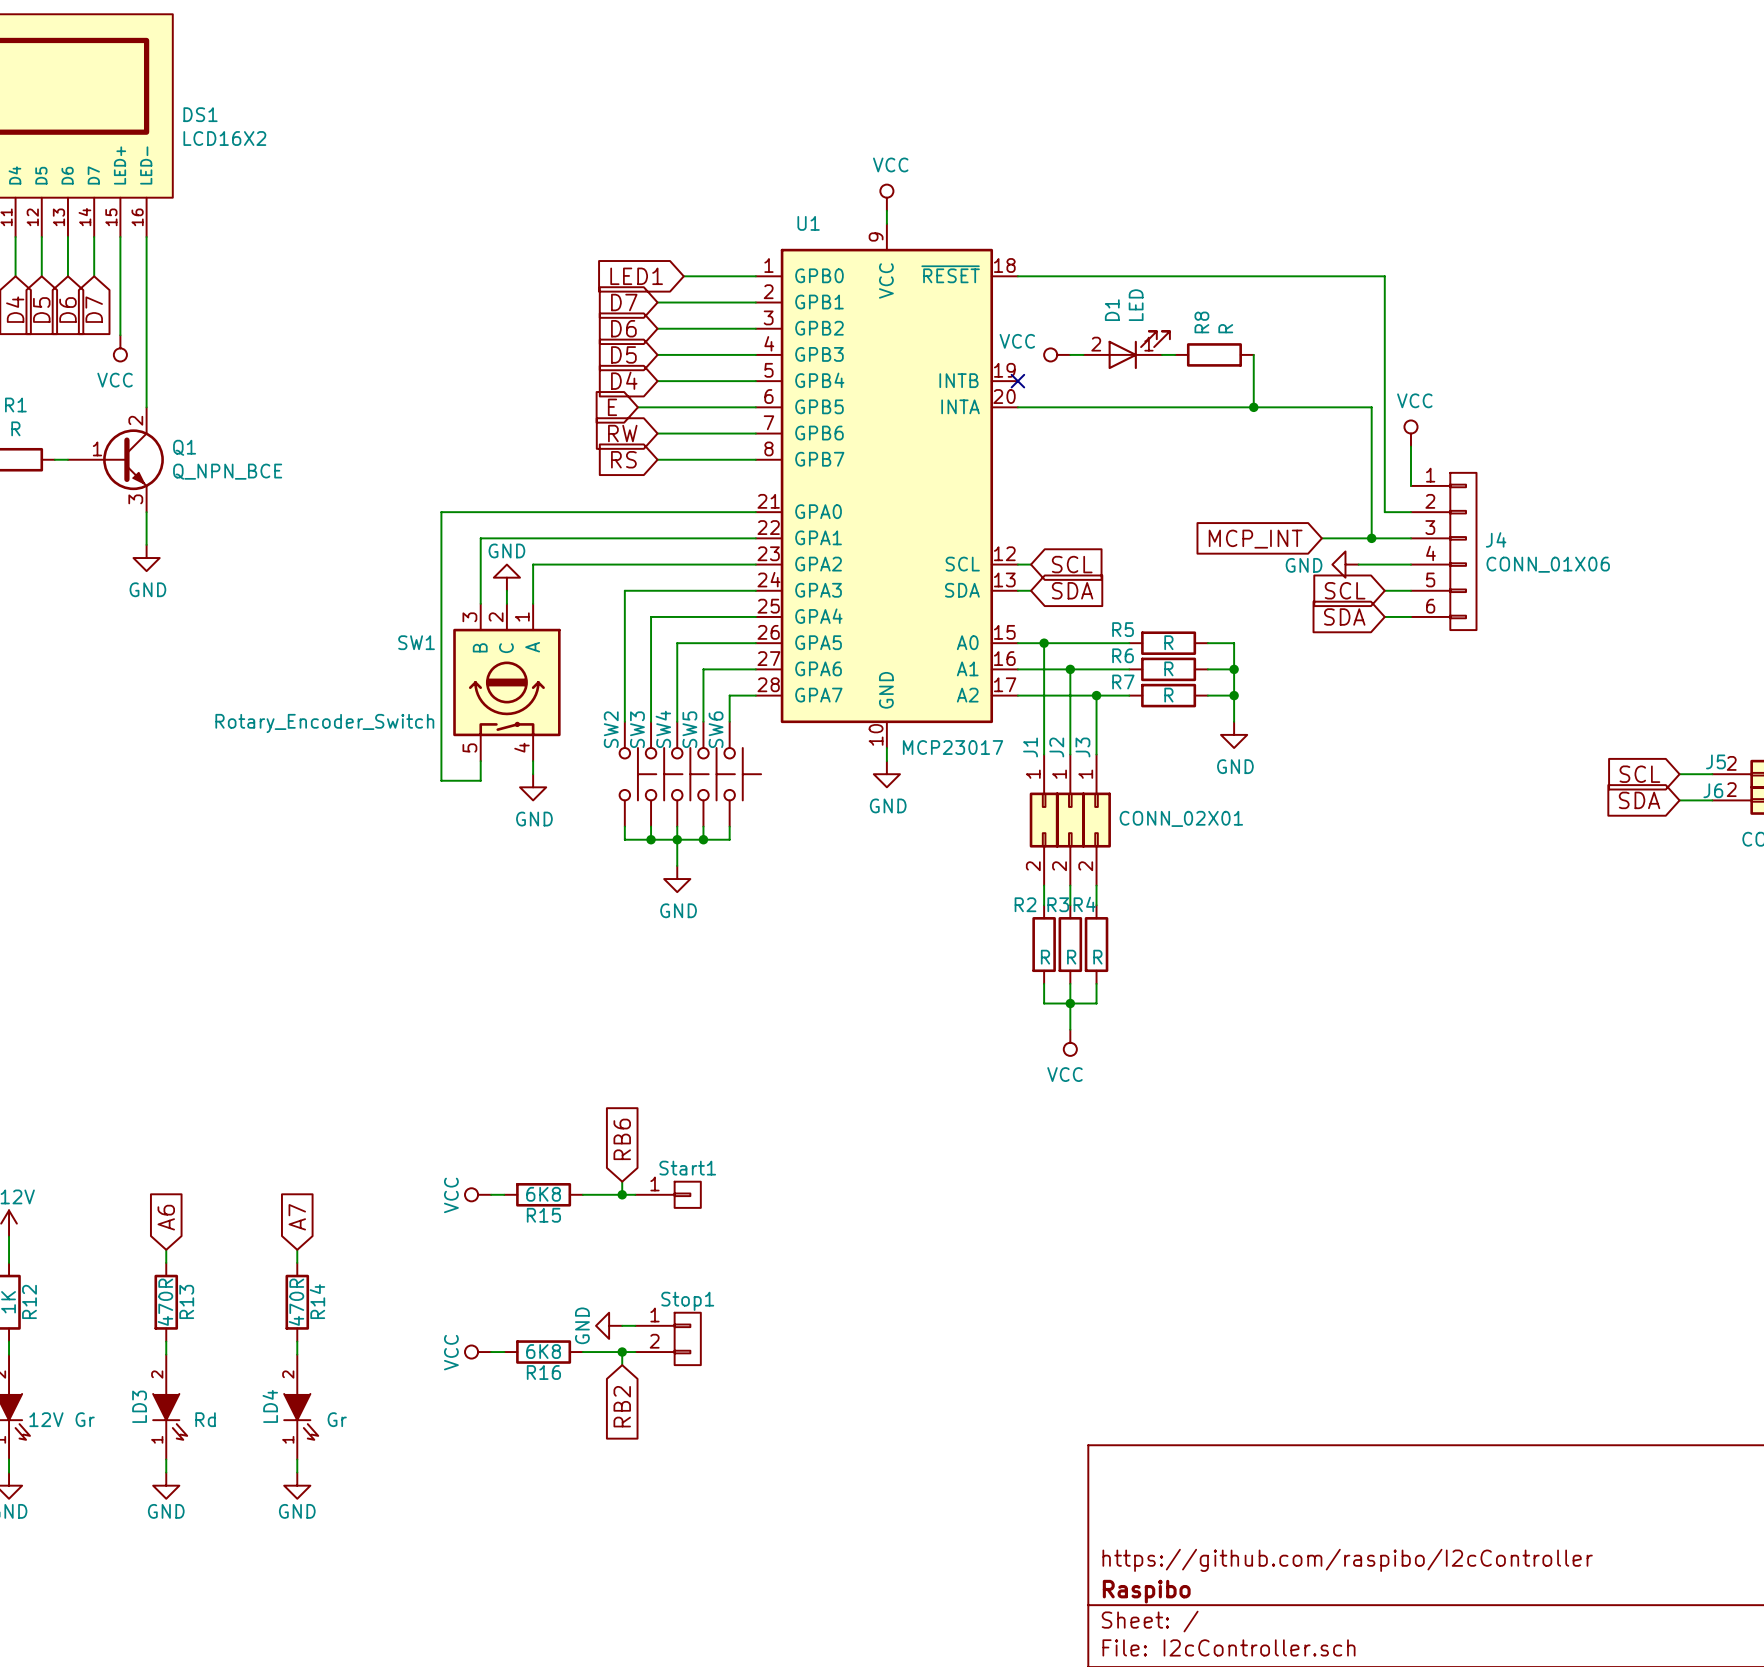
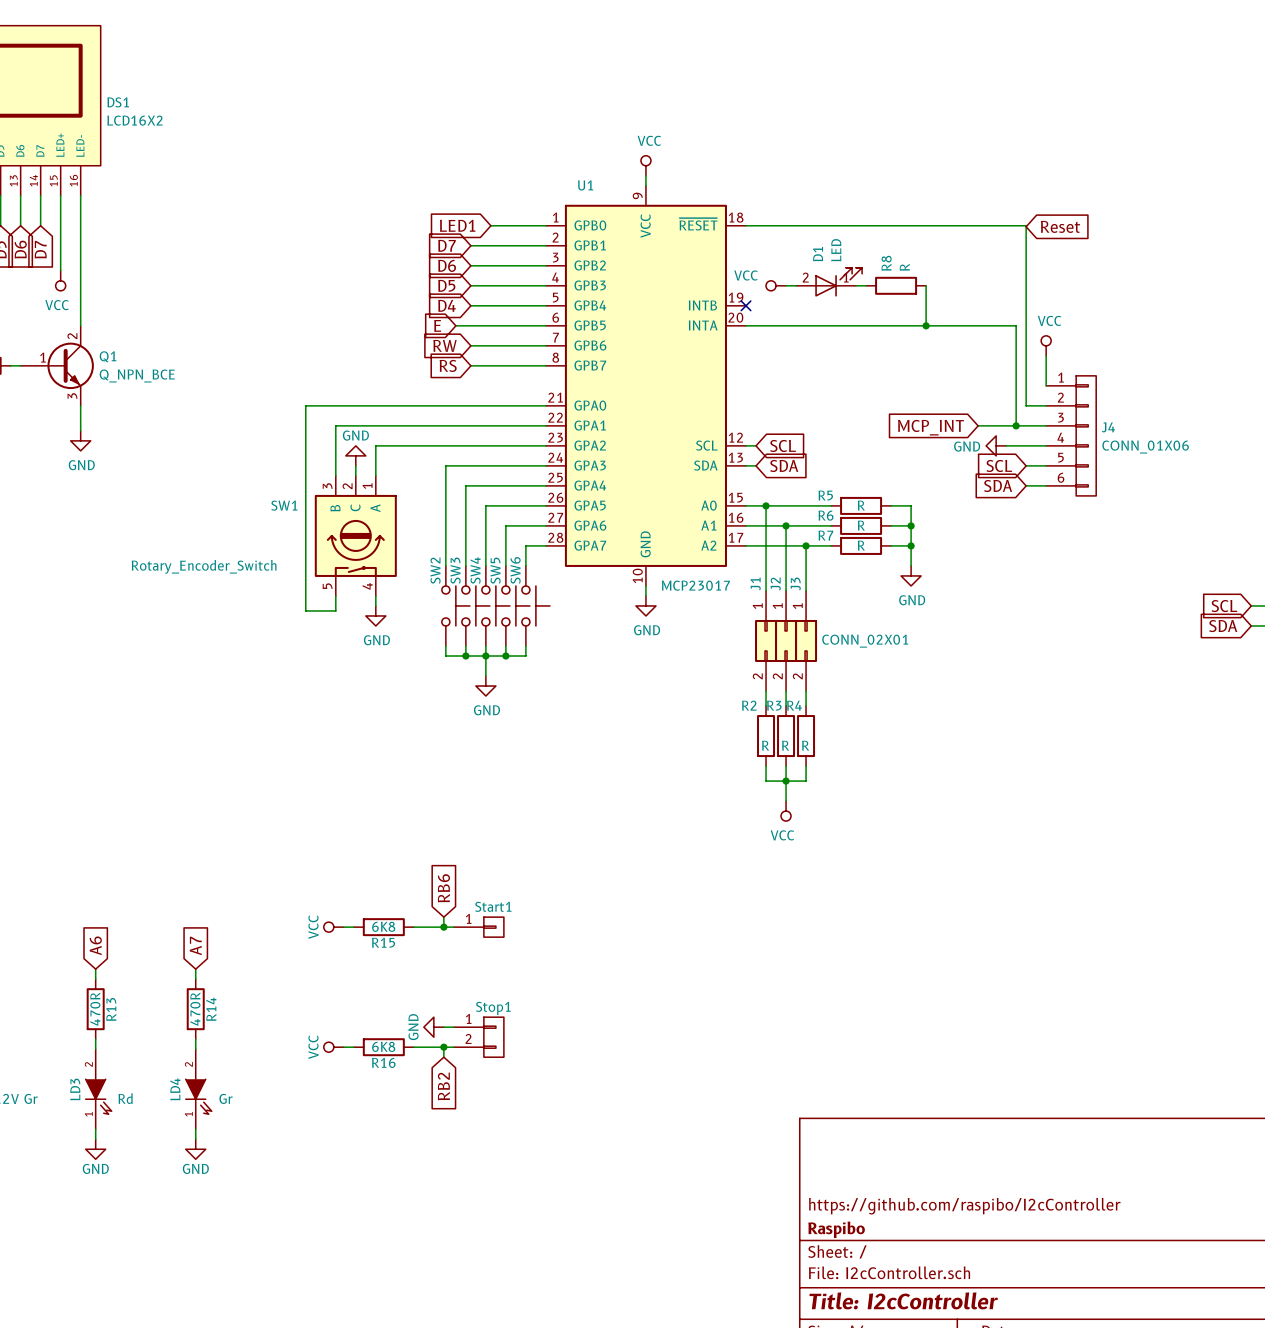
global label: none -> Reset (1060, 226)

